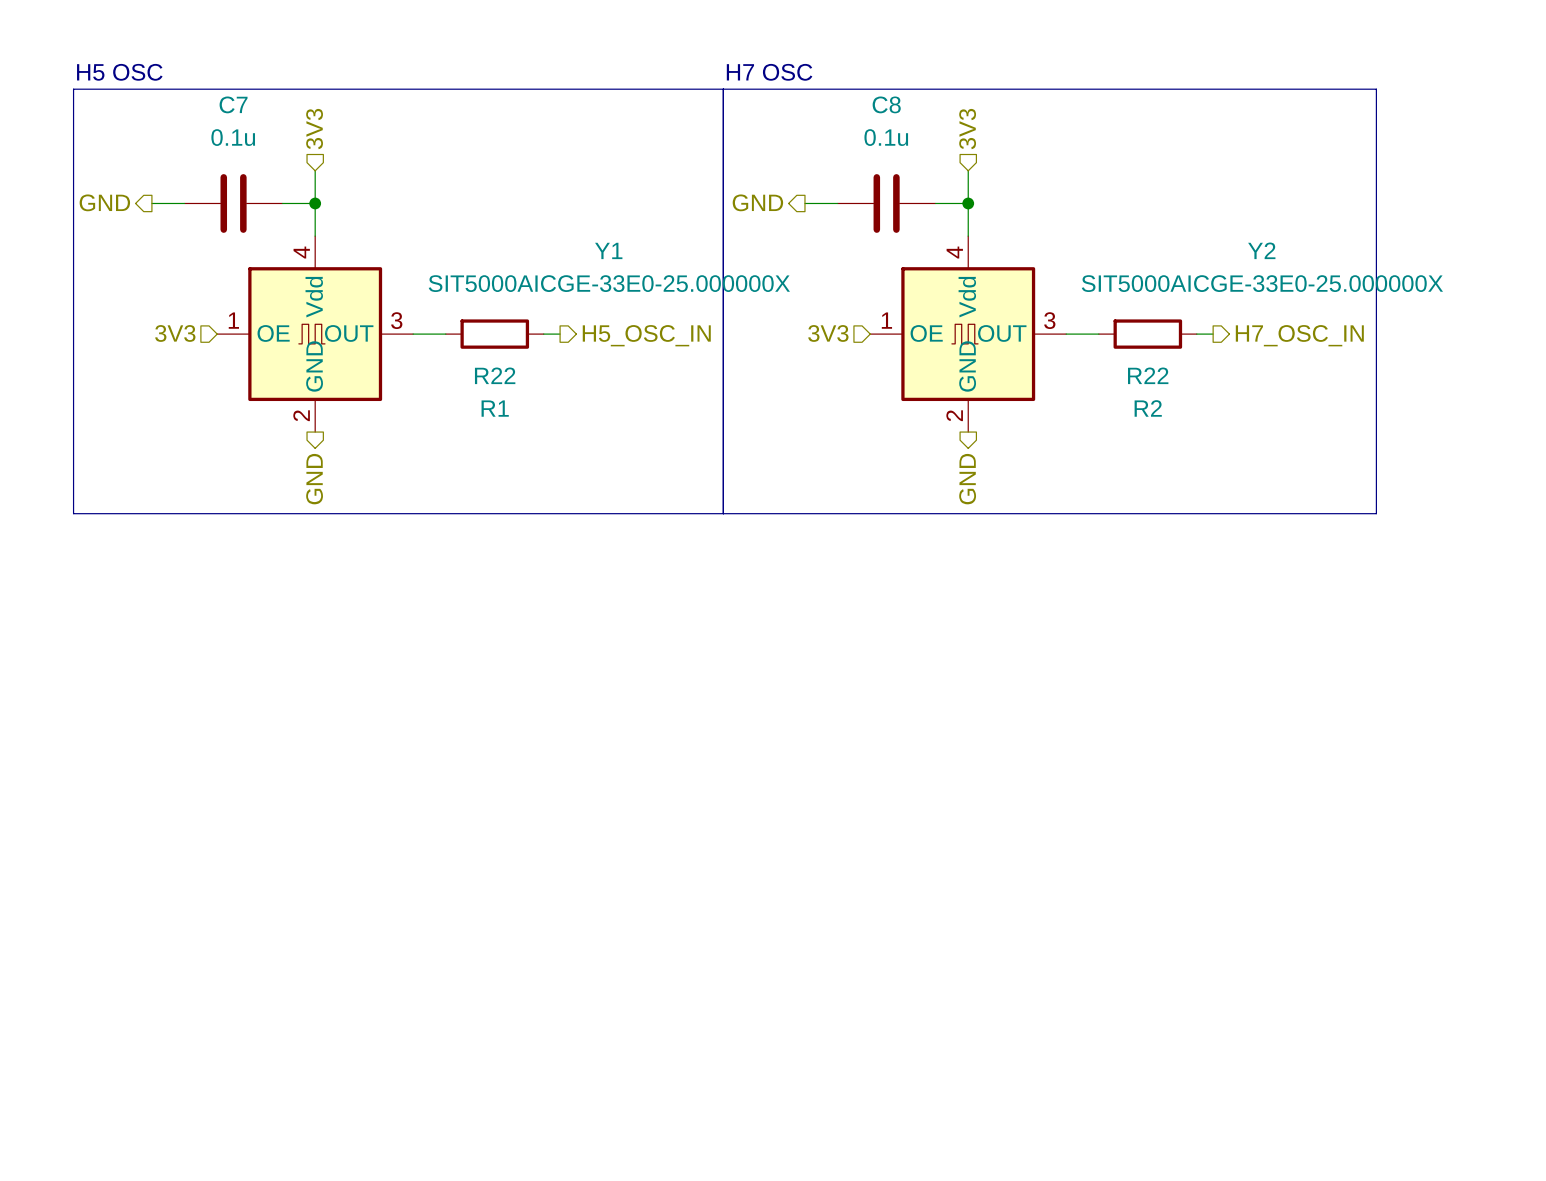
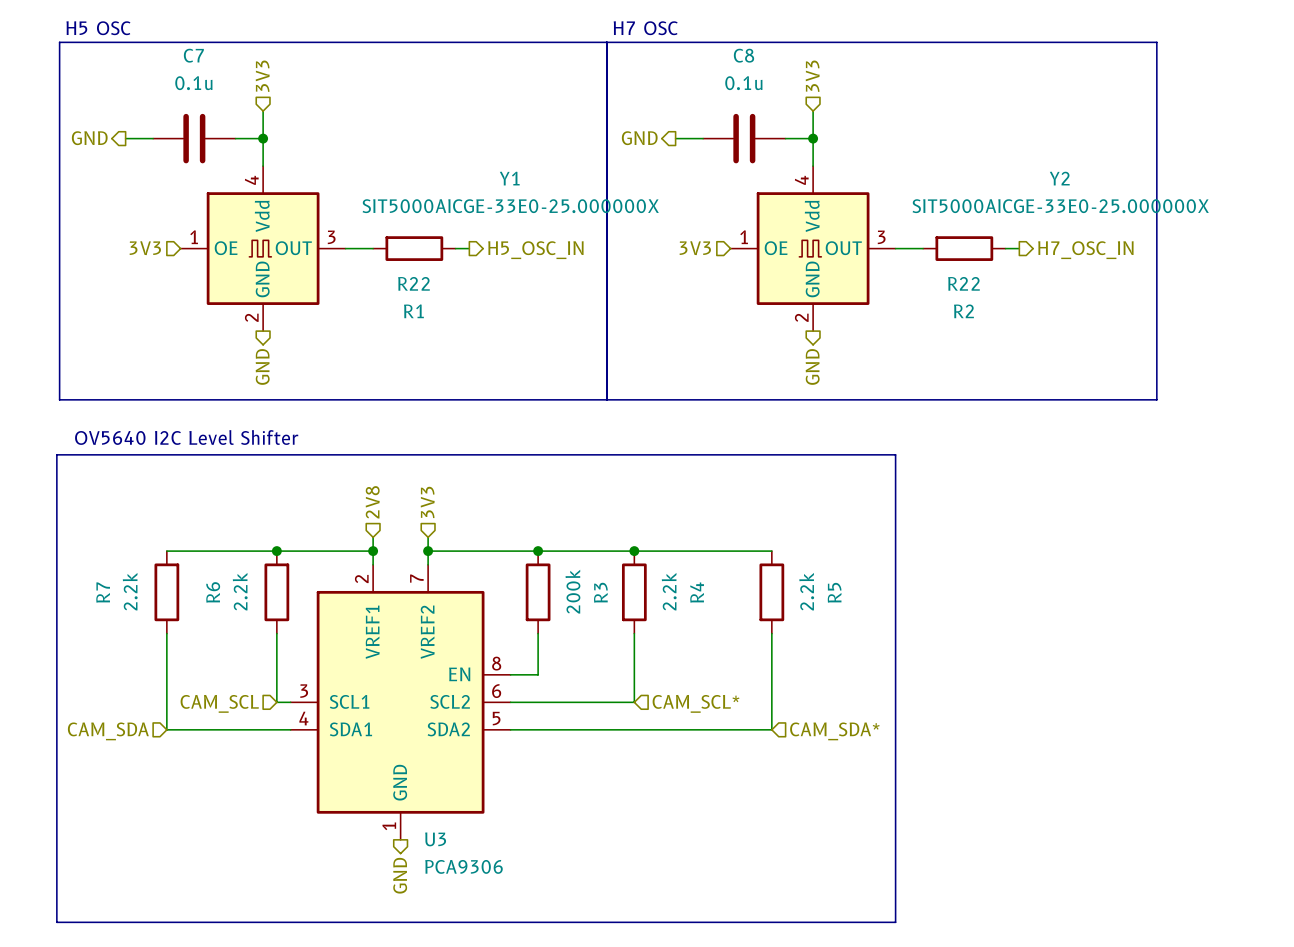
text: none -> OV5640 I2C Level Shifter (186, 437)
line: none -> (56, 454) (56, 922) (895, 922) (895, 454) (56, 454)
hierarchical label: none -> 2V8 (372, 502)
hierarchical label: none -> 3V3 (427, 502)
wire: none -> (373, 537) (373, 564)
wire: none -> (428, 537) (428, 564)
wire: none -> (166, 551) (373, 551)
junction: none -> (276, 551)
junction: none -> (373, 551)
wire: none -> (428, 551) (771, 551)
junction: none -> (428, 551)
junction: none -> (538, 551)
junction: none -> (634, 551)
R7: none -> 2.2k (166, 592)
R6: none -> 2.2k (276, 592)
R3: none -> 200k (538, 592)
R4: none -> 2.2k (634, 592)
R5: none -> 2.2k (771, 592)
wire: none -> (166, 633) (166, 729) (290, 729)
wire: none -> (276, 633) (276, 702) (290, 702)
wire: none -> (538, 633) (538, 674) (510, 674)
wire: none -> (634, 633) (634, 702) (510, 702)
wire: none -> (771, 633) (771, 729) (510, 729)
U3: none -> PCA9306 (400, 702)
hierarchical label: none -> CAM_SCL (219, 703)
hierarchical label: none -> CAM_SCL* (696, 703)
hierarchical label: none -> CAM_SDA (108, 731)
hierarchical label: none -> CAM_SDA* (834, 731)
hierarchical label: none -> GND (400, 875)

